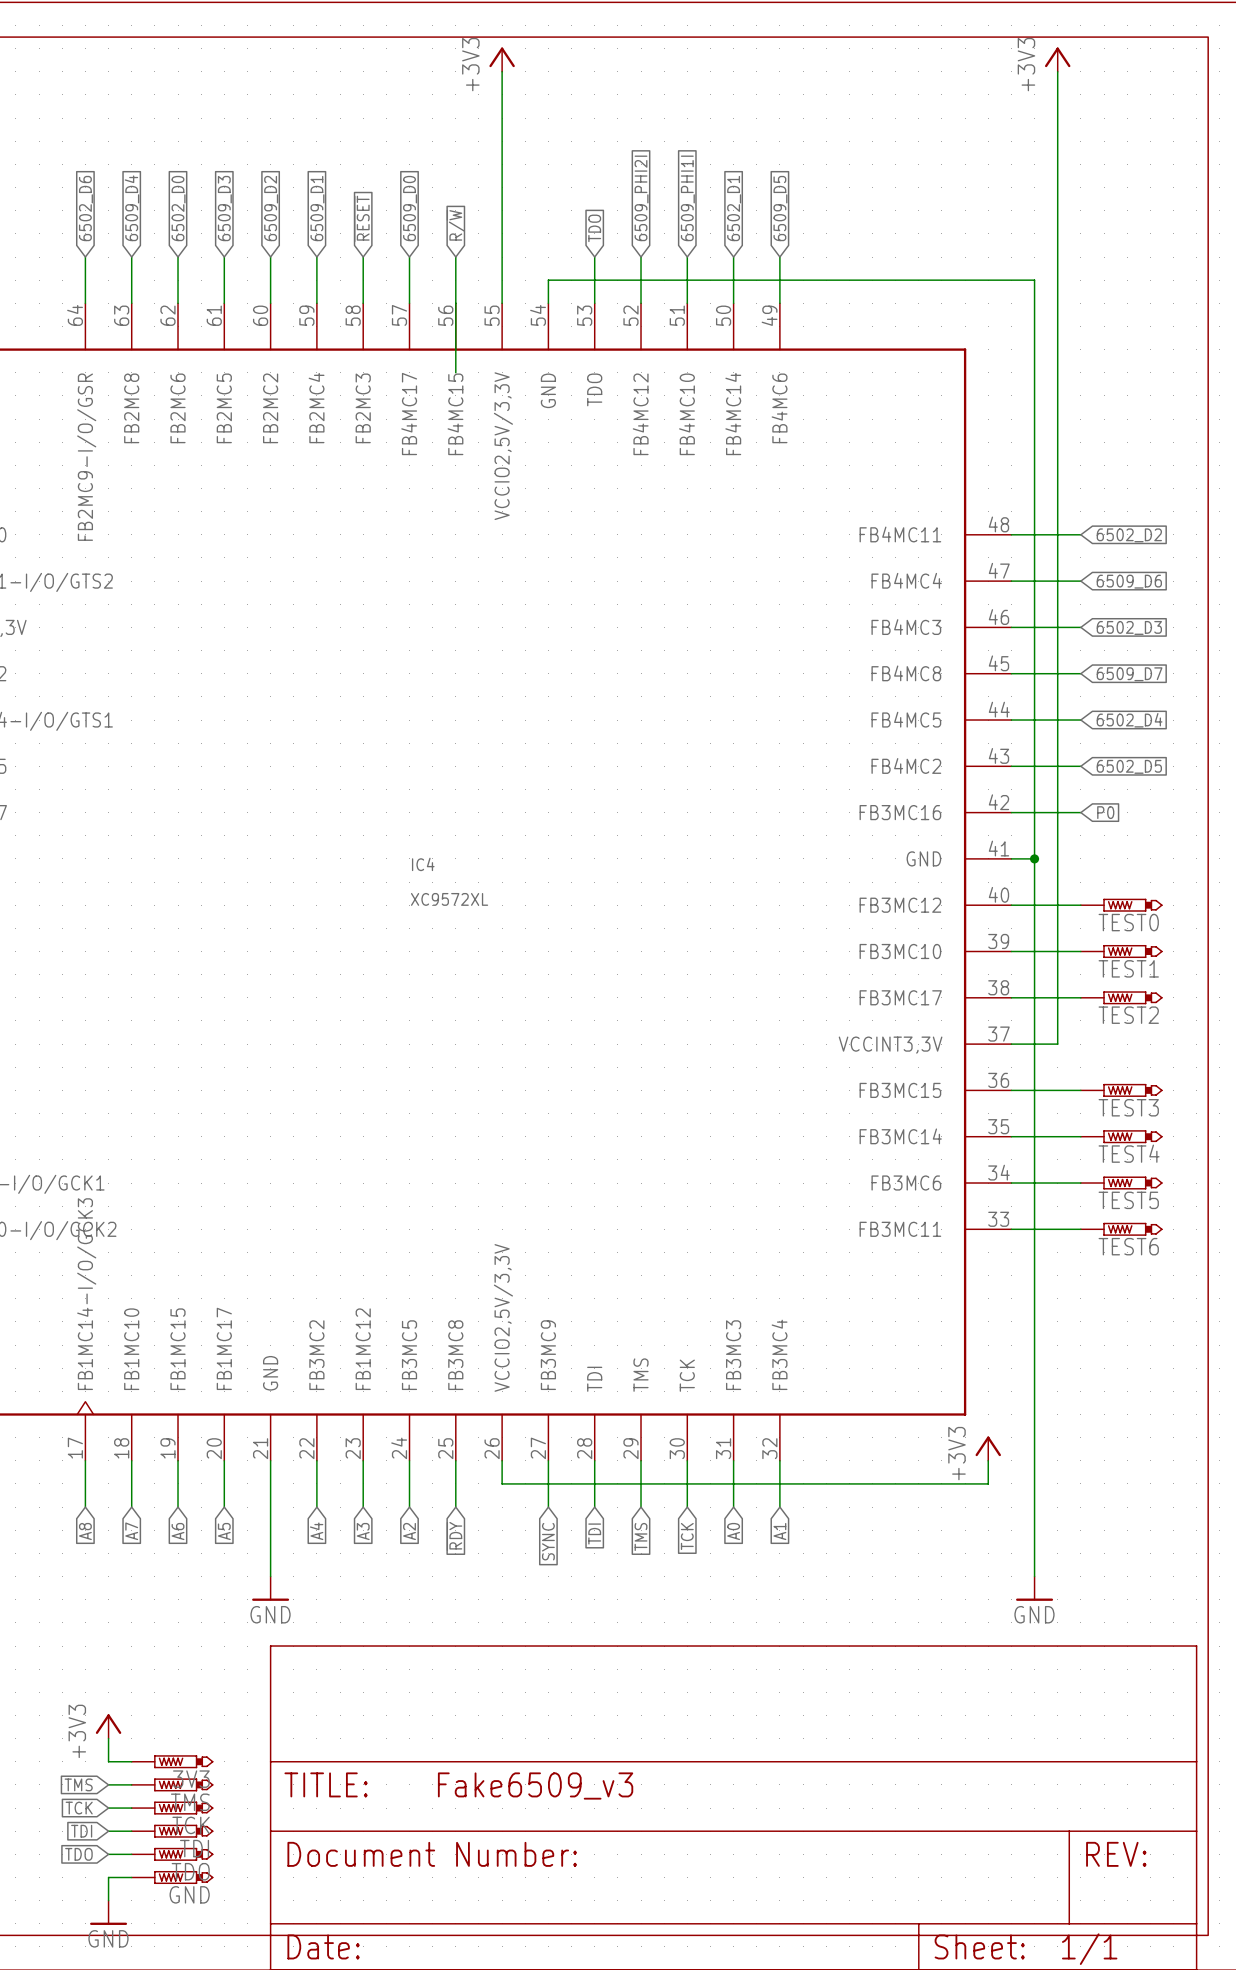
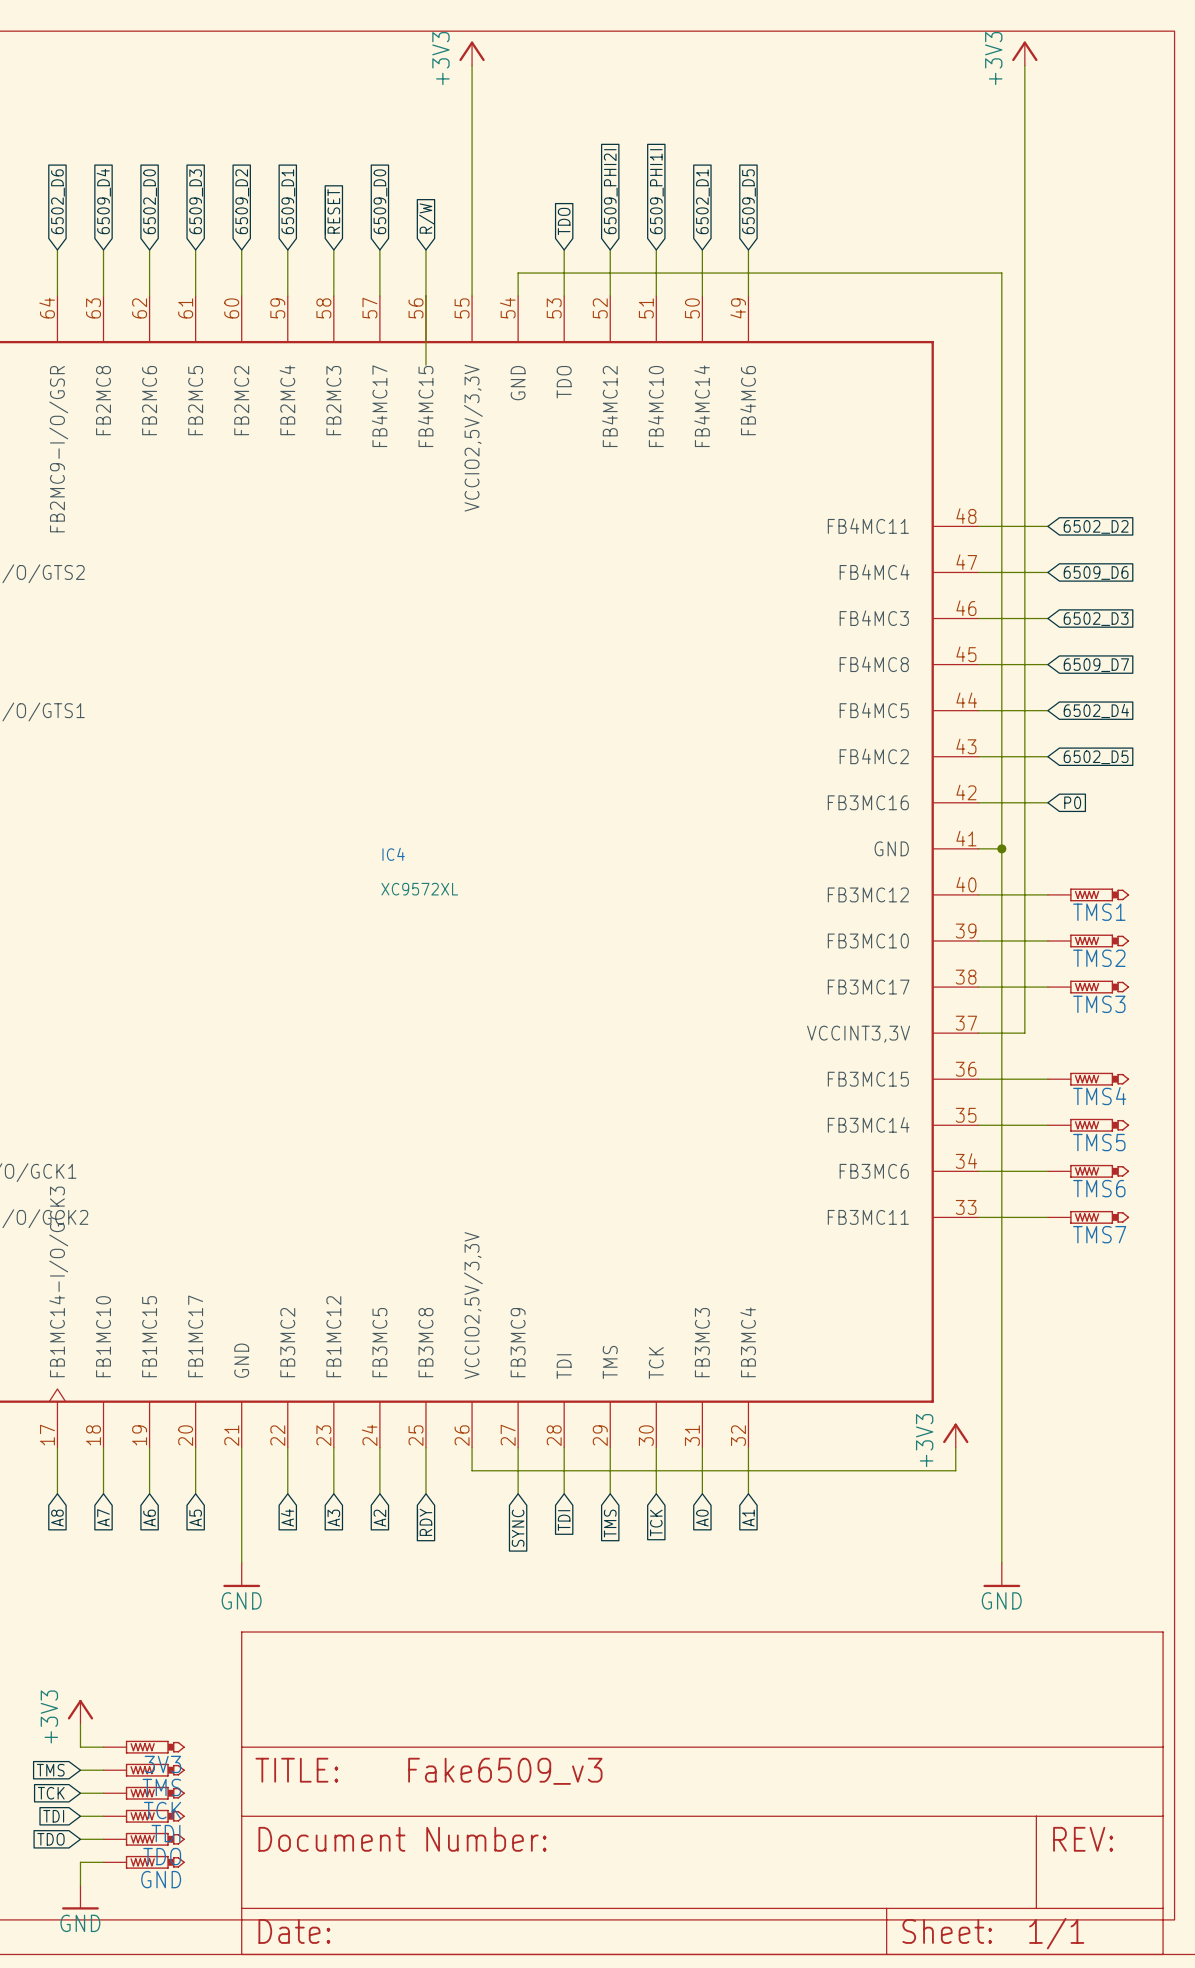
TEST0 name: TEST0 (1128, 922) -> TMS1 (1099, 912)
TEST1 name: TEST1 (1128, 968) -> TMS2 (1099, 958)
TEST2 name: TEST2 (1128, 1015) -> TMS3 (1099, 1004)
TEST3 name: TEST3 (1128, 1107) -> TMS4 (1099, 1096)
TEST4 name: TEST4 (1129, 1153) -> TMS5 (1099, 1142)
TEST5 name: TEST5 (1128, 1200) -> TMS6 (1099, 1188)
TEST6 name: TEST6 (1128, 1246) -> TMS7 (1099, 1234)

